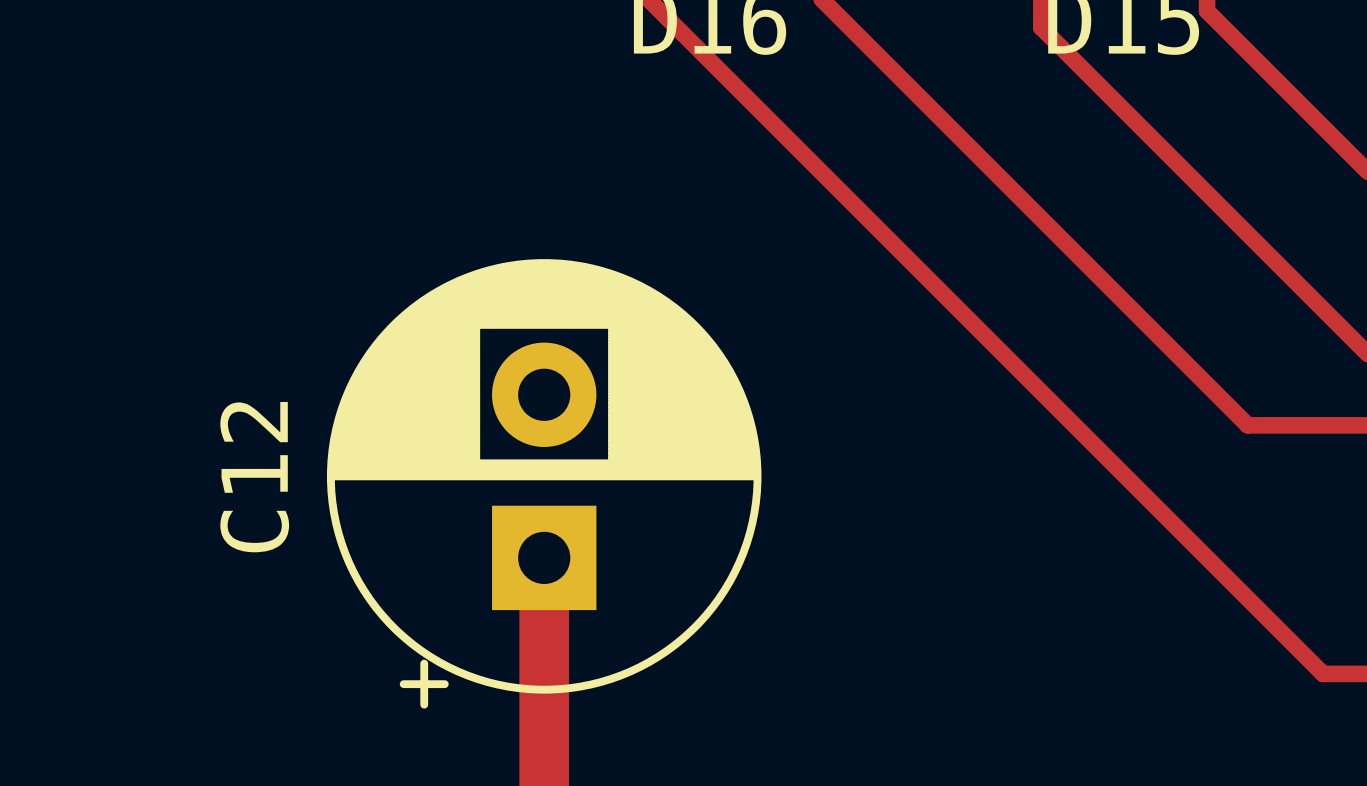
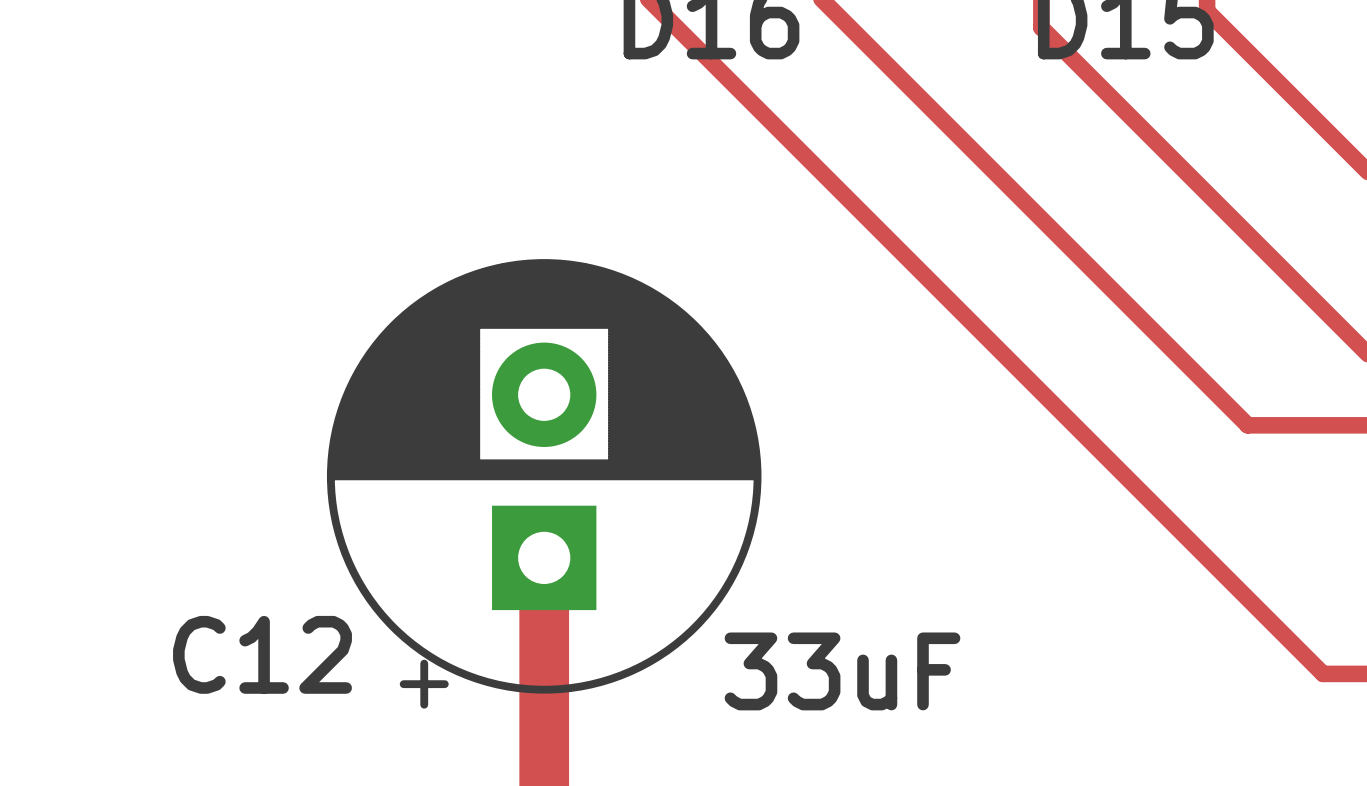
C12 name rotation: 0° (254, 477) -> 90° clockwise (262, 654)
C12 value: none -> 33uF (842, 671)

